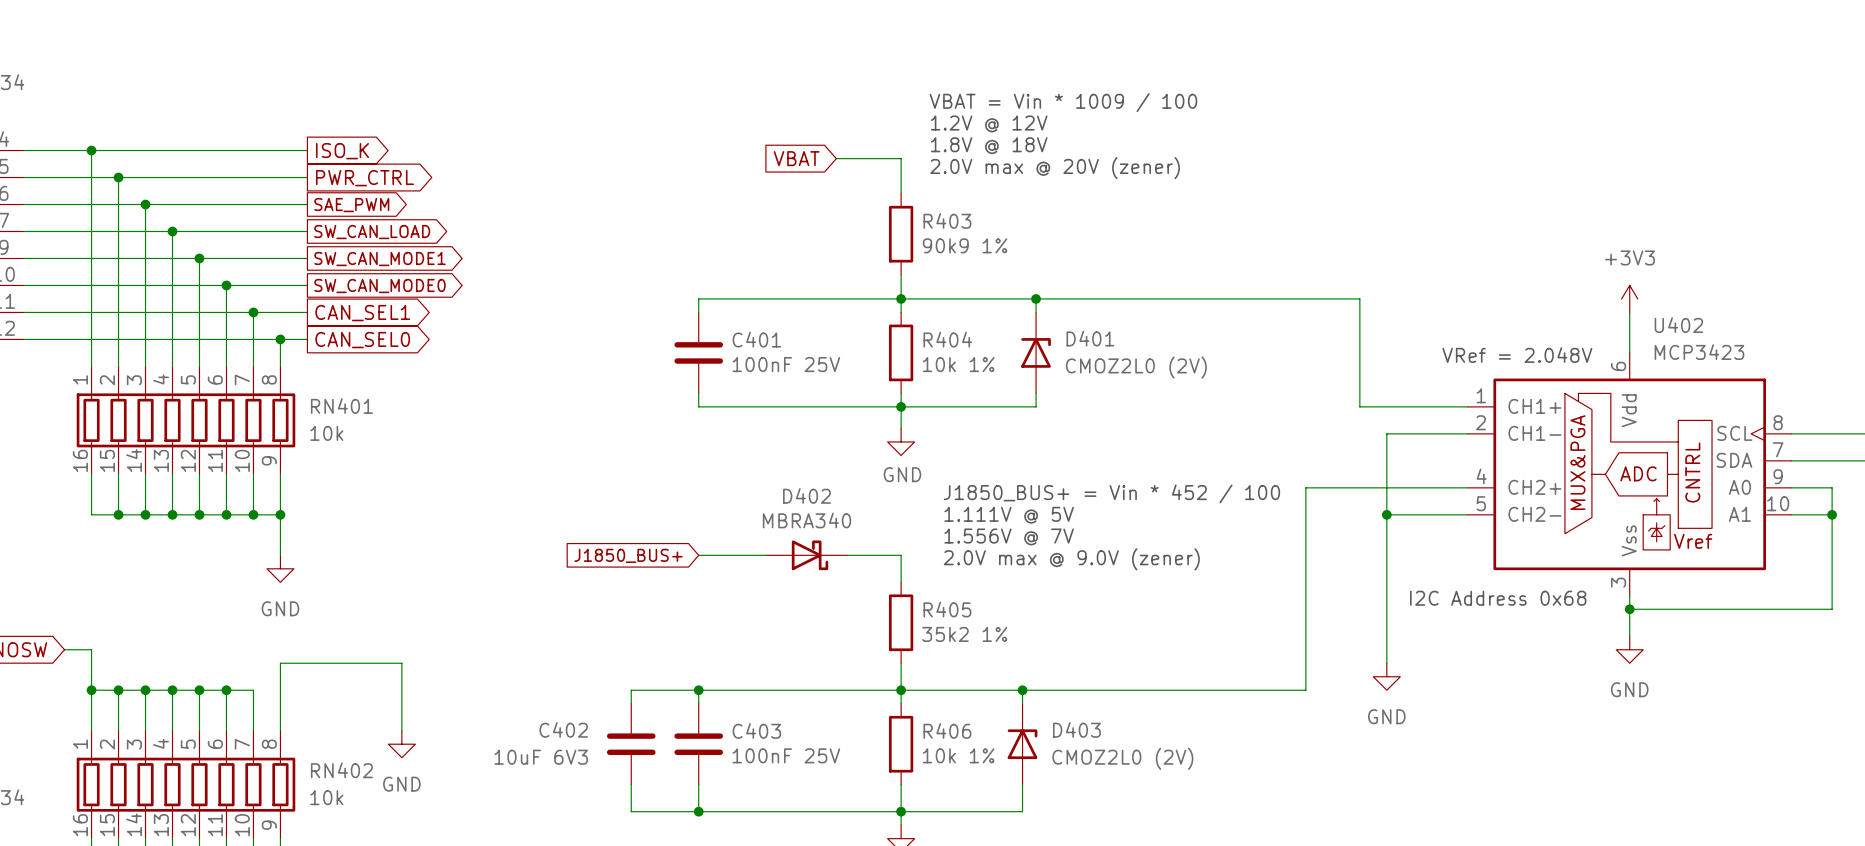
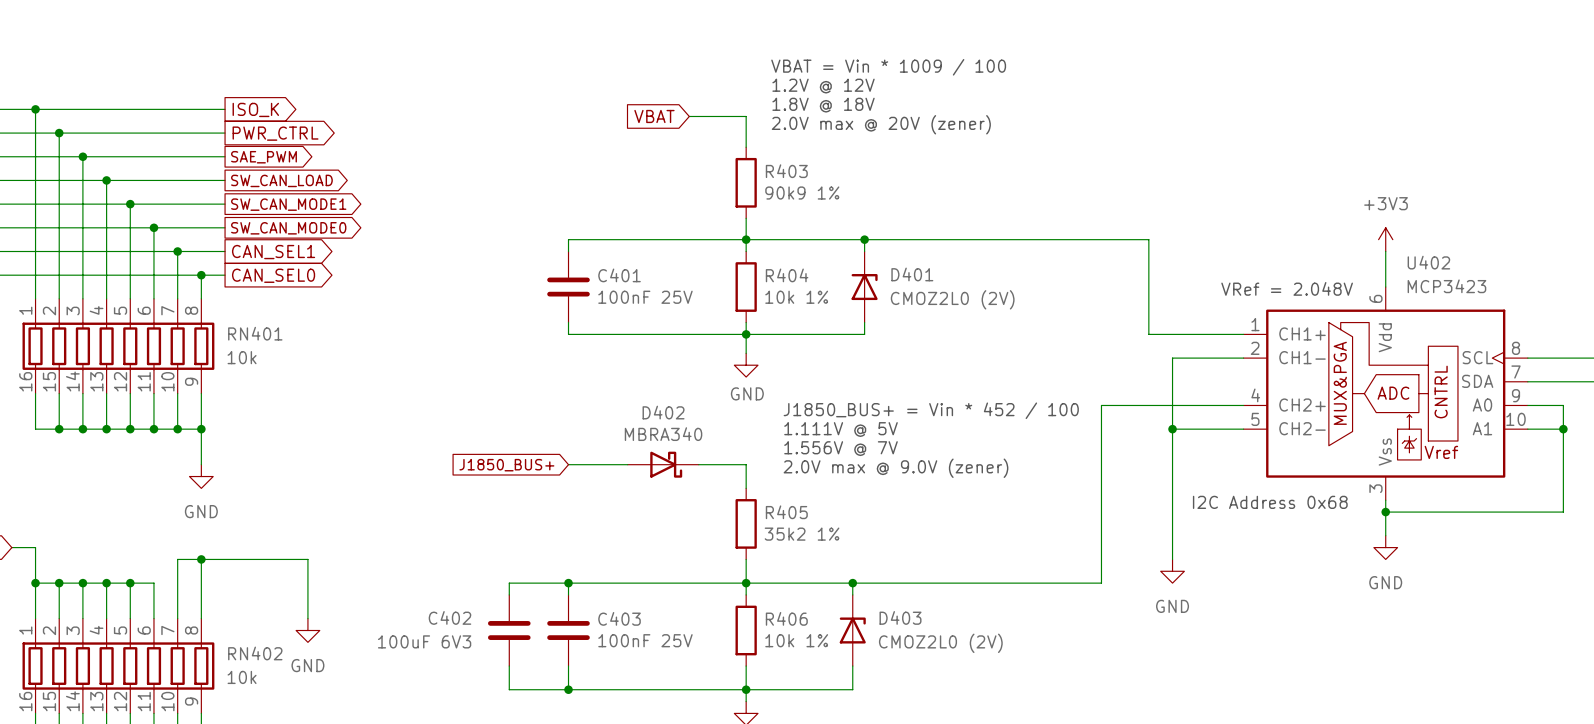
wire: (226, 690) (253, 690) -> (201, 559) (177, 559) (177, 583)
junction position: (226, 690) -> (201, 559)
C402 value: 10uF 6V3 (541, 757) -> 100uF 6V3 (424, 641)

